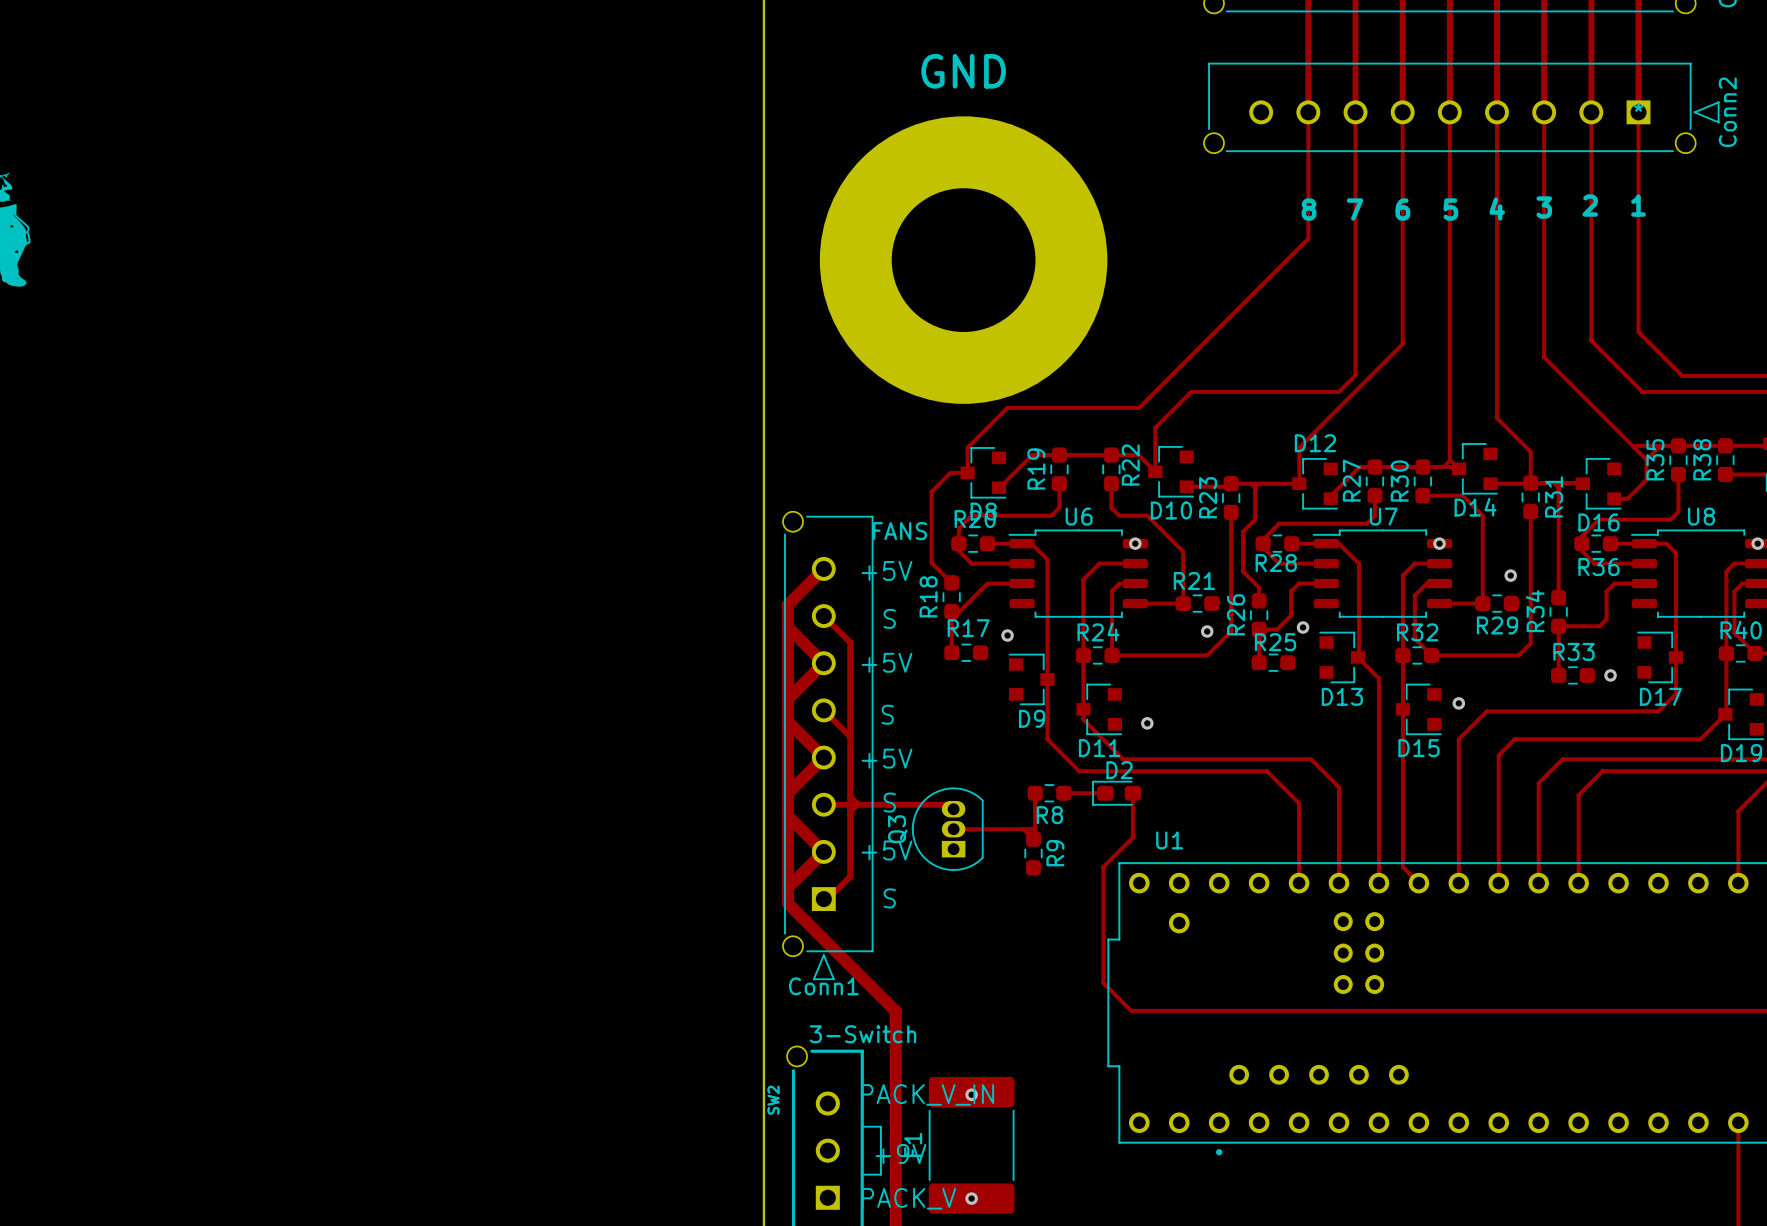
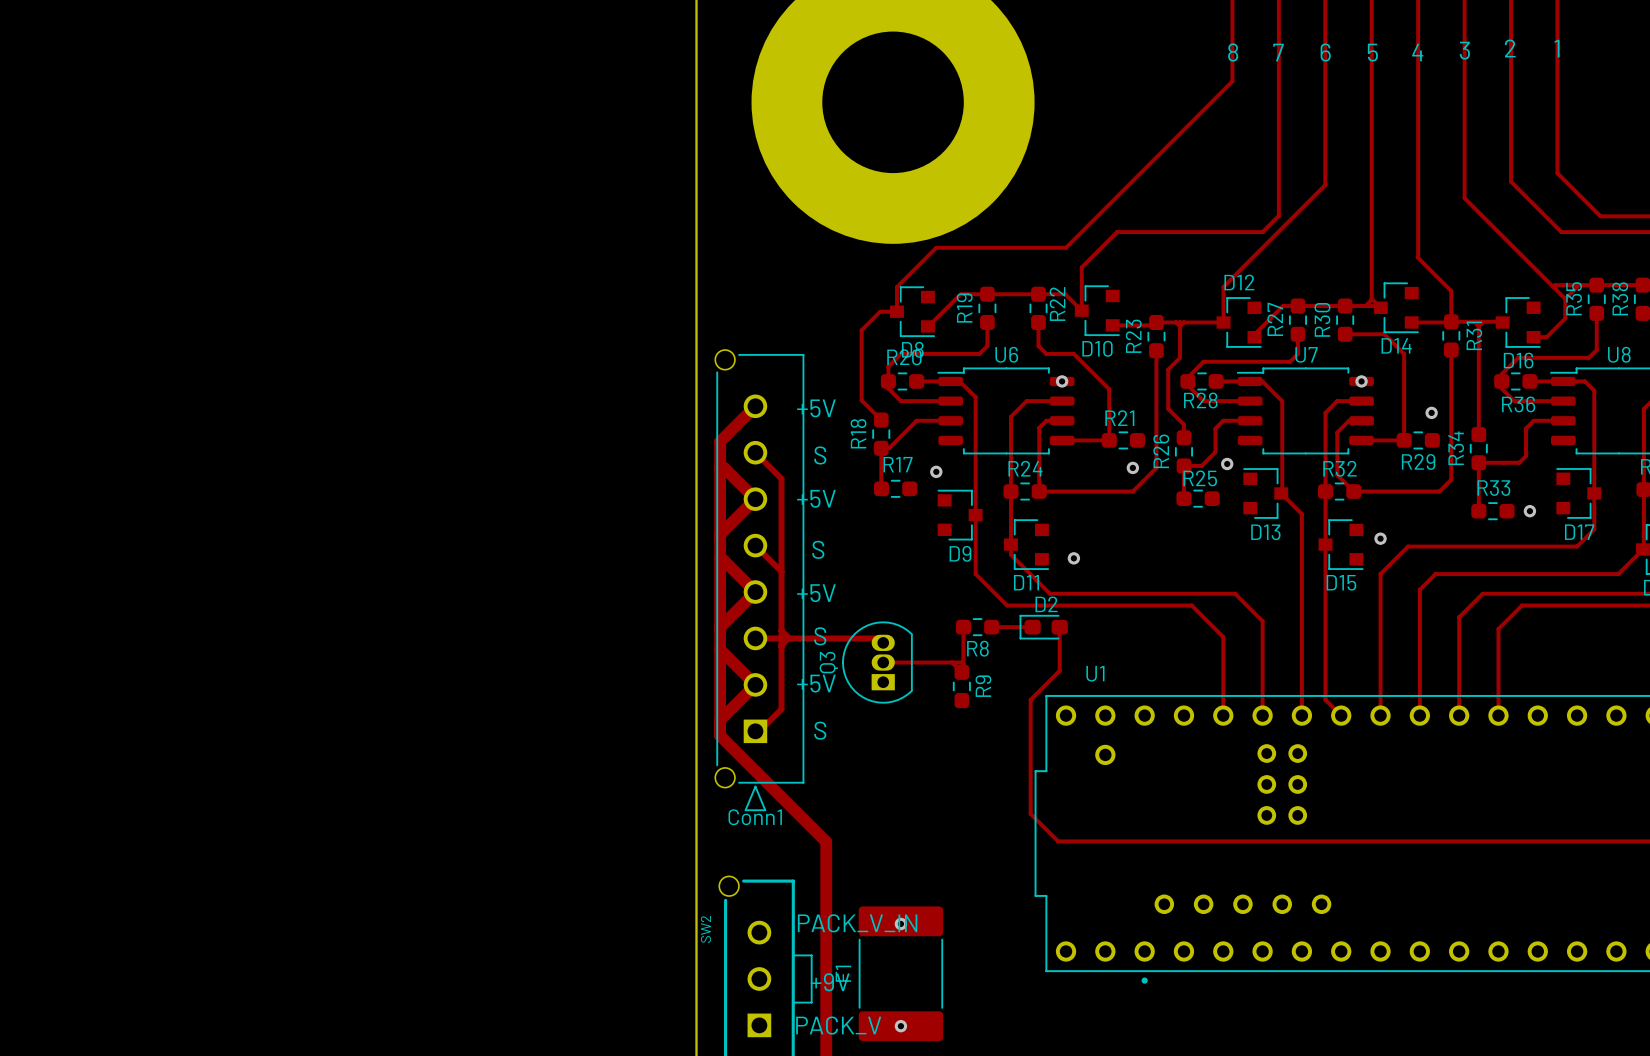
text: FANS (900, 531) -> none
text: 3-Switch (863, 1034) -> none

